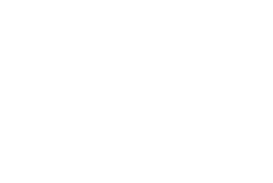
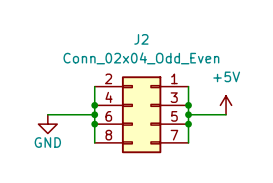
wire: none -> (94, 86) (94, 142)
wire: none -> (188, 86) (188, 142)
junction: none -> (94, 105)
junction: none -> (188, 105)
power symbol: none -> +5V (226, 105)
wire: none -> (47, 114) (94, 114)
junction: none -> (94, 114)
J2: none -> Conn_02x04_Odd_Even (141, 114)
wire: none -> (188, 114) (226, 114)
junction: none -> (188, 114)
power symbol: none -> GND (47, 124)
junction: none -> (94, 124)
junction: none -> (188, 124)

